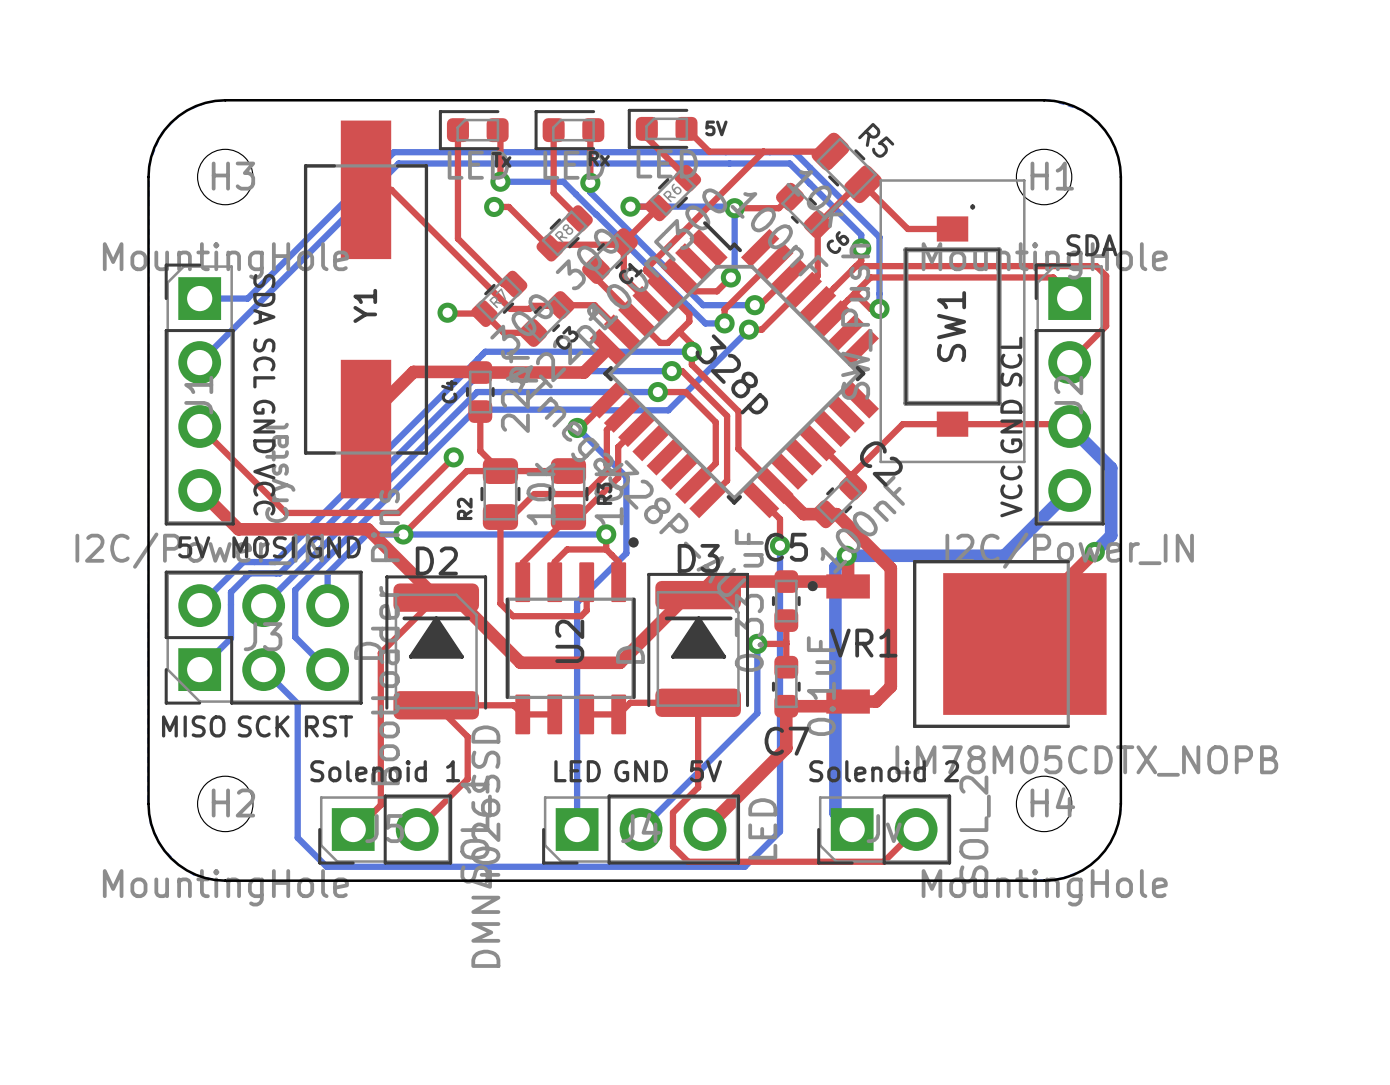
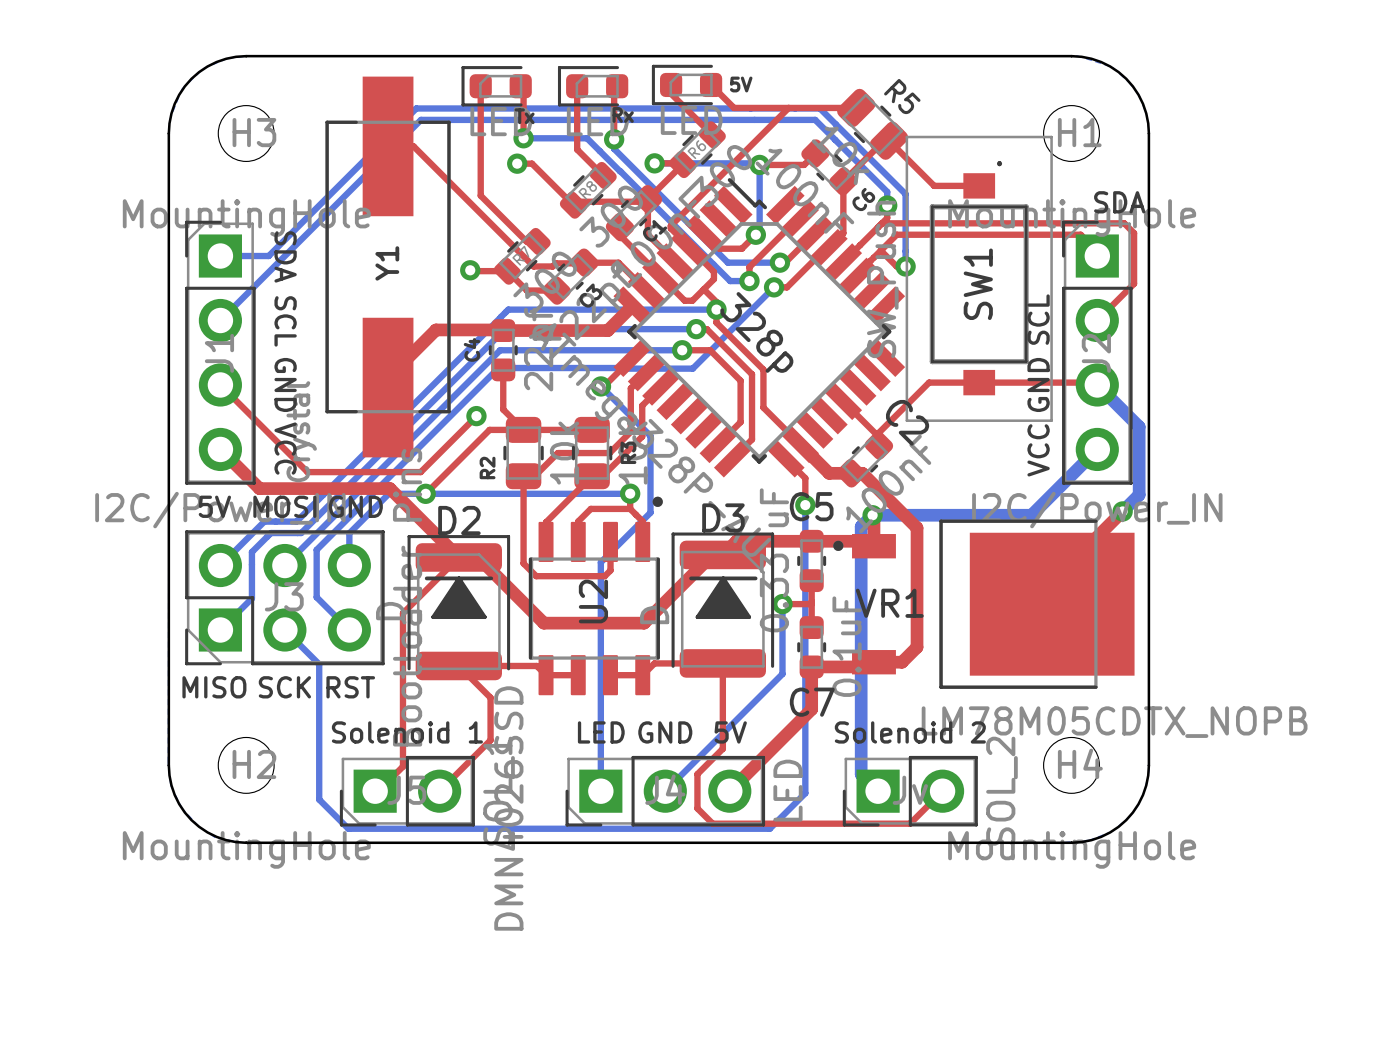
C6 footprint: [776, 182, 832, 239] -> [801, 139, 858, 196]

